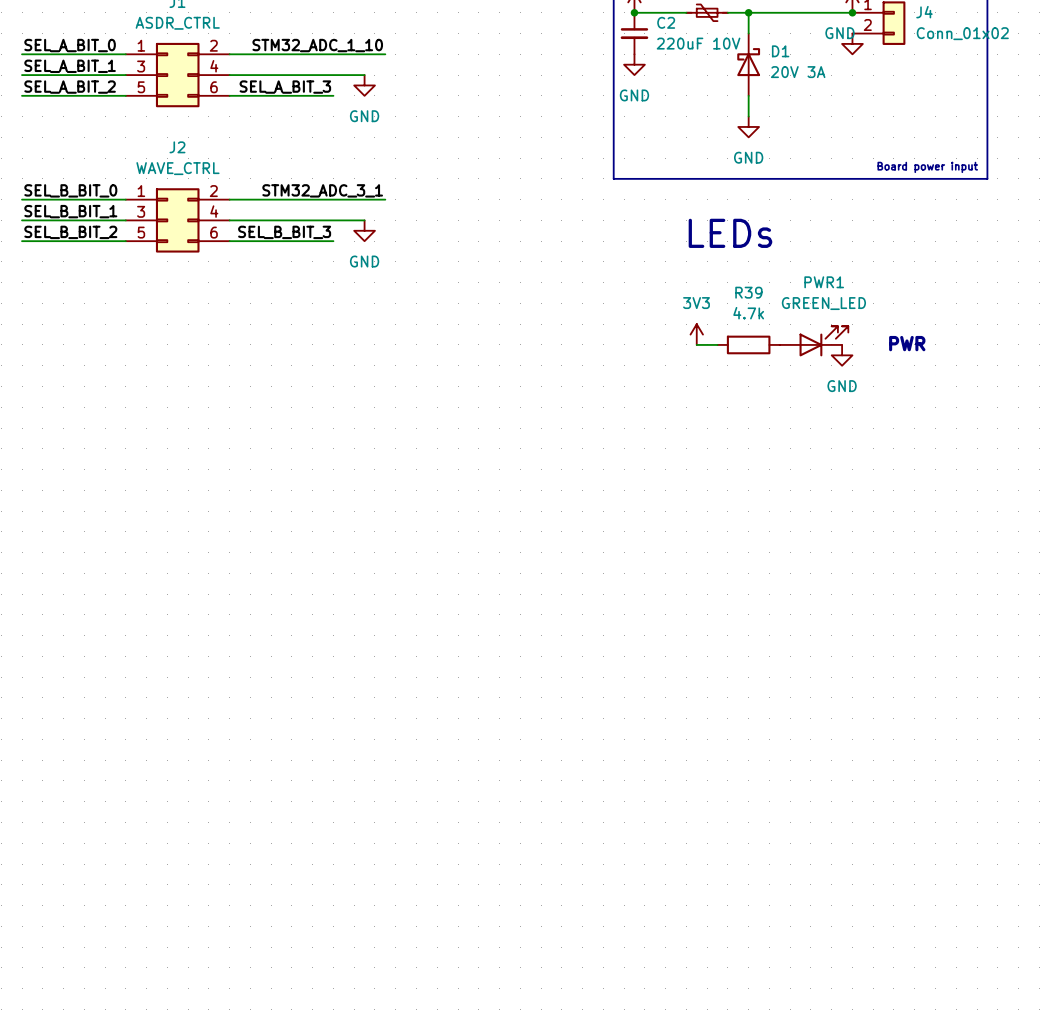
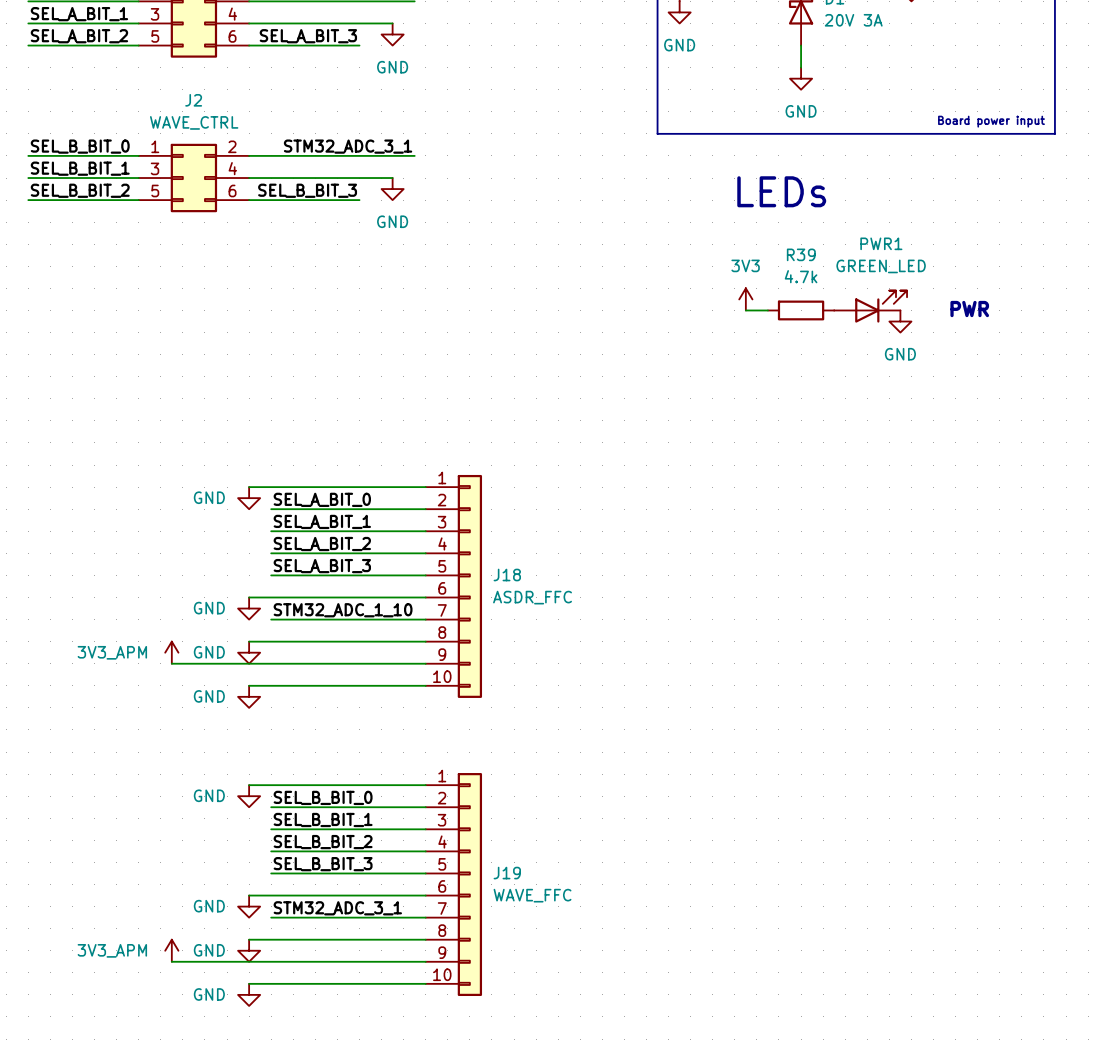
wire: none -> (249, 487) (425, 487)
power symbol: none -> GND (249, 498)
label: none -> SEL_A_BIT_0 (322, 499)
wire: none -> (271, 509) (425, 509)
label: none -> SEL_A_BIT_1 (322, 521)
wire: none -> (271, 531) (425, 531)
label: none -> SEL_A_BIT_2 (322, 544)
wire: none -> (271, 553) (425, 553)
label: none -> SEL_A_BIT_3 (322, 566)
wire: none -> (271, 575) (425, 575)
J18: none -> ASDR_FFC (453, 586)
wire: none -> (249, 597) (425, 597)
power symbol: none -> GND (249, 608)
label: none -> STM32_ADC_1_10 (343, 610)
wire: none -> (271, 619) (425, 619)
wire: none -> (249, 641) (425, 641)
power symbol: none -> 3V3_APM (171, 652)
power symbol: none -> GND (249, 652)
wire: none -> (171, 663) (425, 663)
wire: none -> (249, 685) (425, 685)
power symbol: none -> GND (249, 696)
wire: none -> (249, 785) (425, 785)
power symbol: none -> GND (249, 796)
label: none -> SEL_B_BIT_0 (323, 797)
wire: none -> (271, 807) (425, 807)
label: none -> SEL_B_BIT_1 (323, 819)
wire: none -> (271, 829) (425, 829)
label: none -> SEL_B_BIT_2 (323, 842)
wire: none -> (271, 851) (425, 851)
label: none -> SEL_B_BIT_3 (323, 864)
wire: none -> (271, 873) (425, 873)
J19: none -> WAVE_FFC (453, 884)
wire: none -> (249, 895) (425, 895)
power symbol: none -> GND (249, 906)
label: none -> STM32_ADC_3_1 (337, 908)
wire: none -> (271, 917) (425, 917)
wire: none -> (249, 939) (425, 939)
power symbol: none -> 3V3_APM (171, 950)
power symbol: none -> GND (249, 950)
wire: none -> (171, 961) (425, 961)
wire: none -> (249, 983) (425, 983)
power symbol: none -> GND (249, 994)

